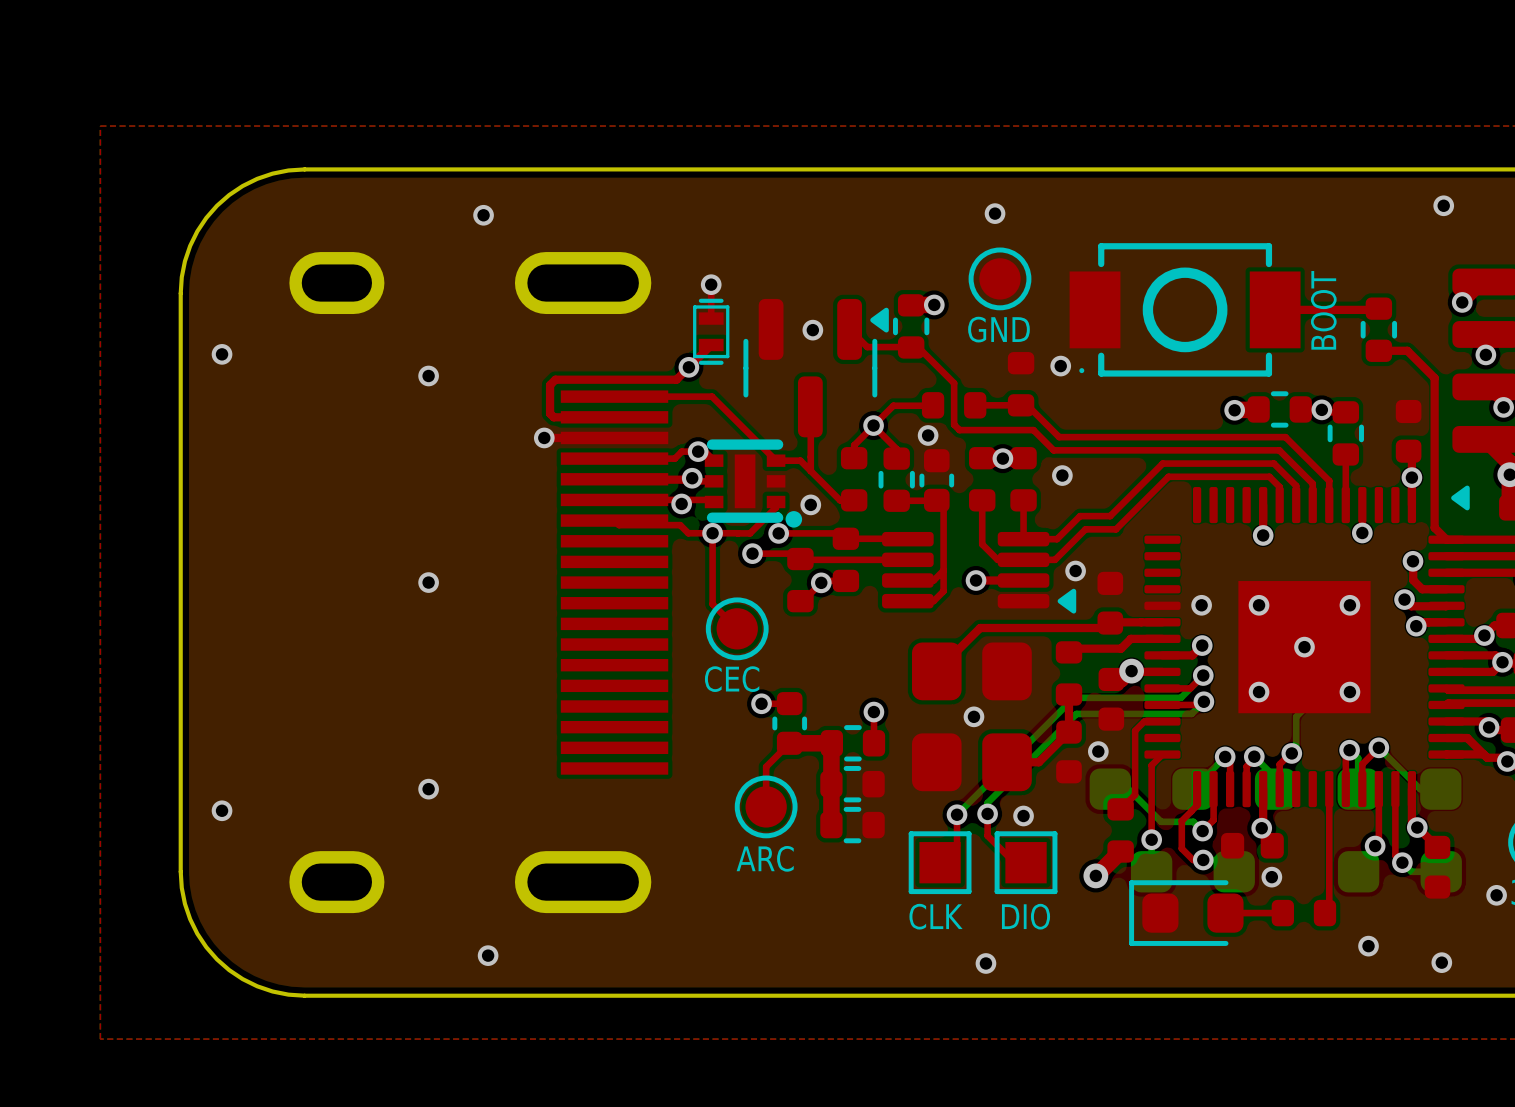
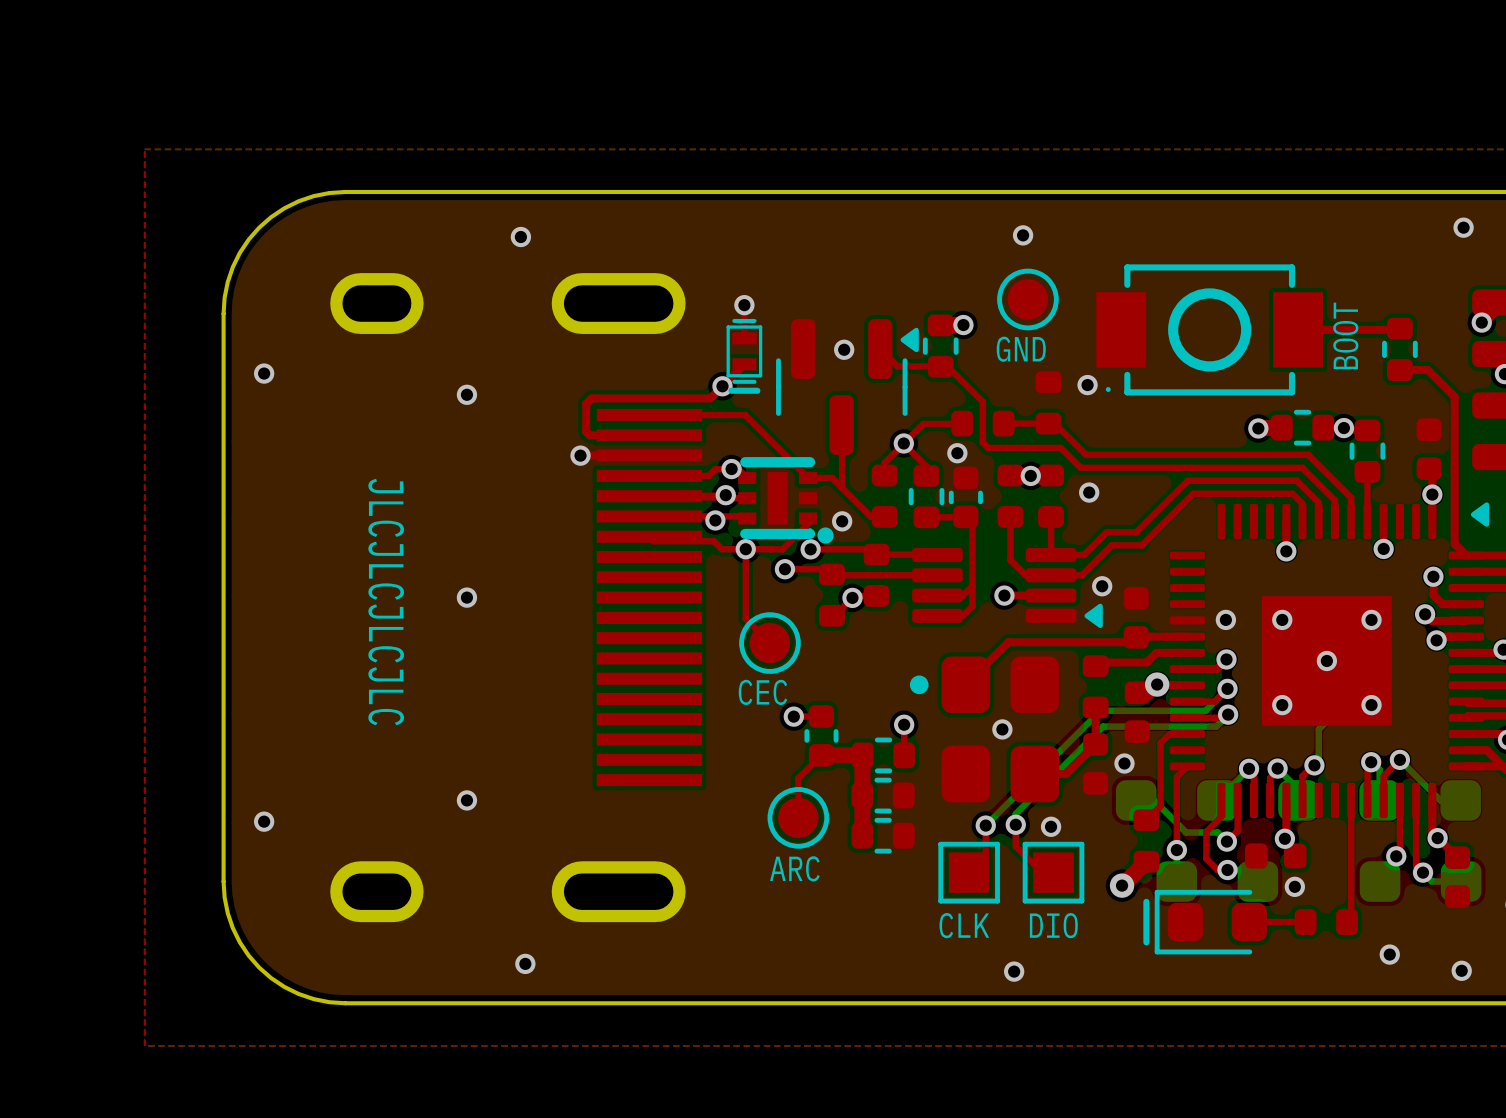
part footprint: [693, 298, 730, 365] -> [726, 318, 763, 394]
text: none -> JLCJLCJLCJLC (386, 602)
part footprint: [912, 642, 1032, 792] -> [909, 656, 1060, 803]
part footprint: [1129, 880, 1244, 946] -> [1143, 889, 1268, 955]

